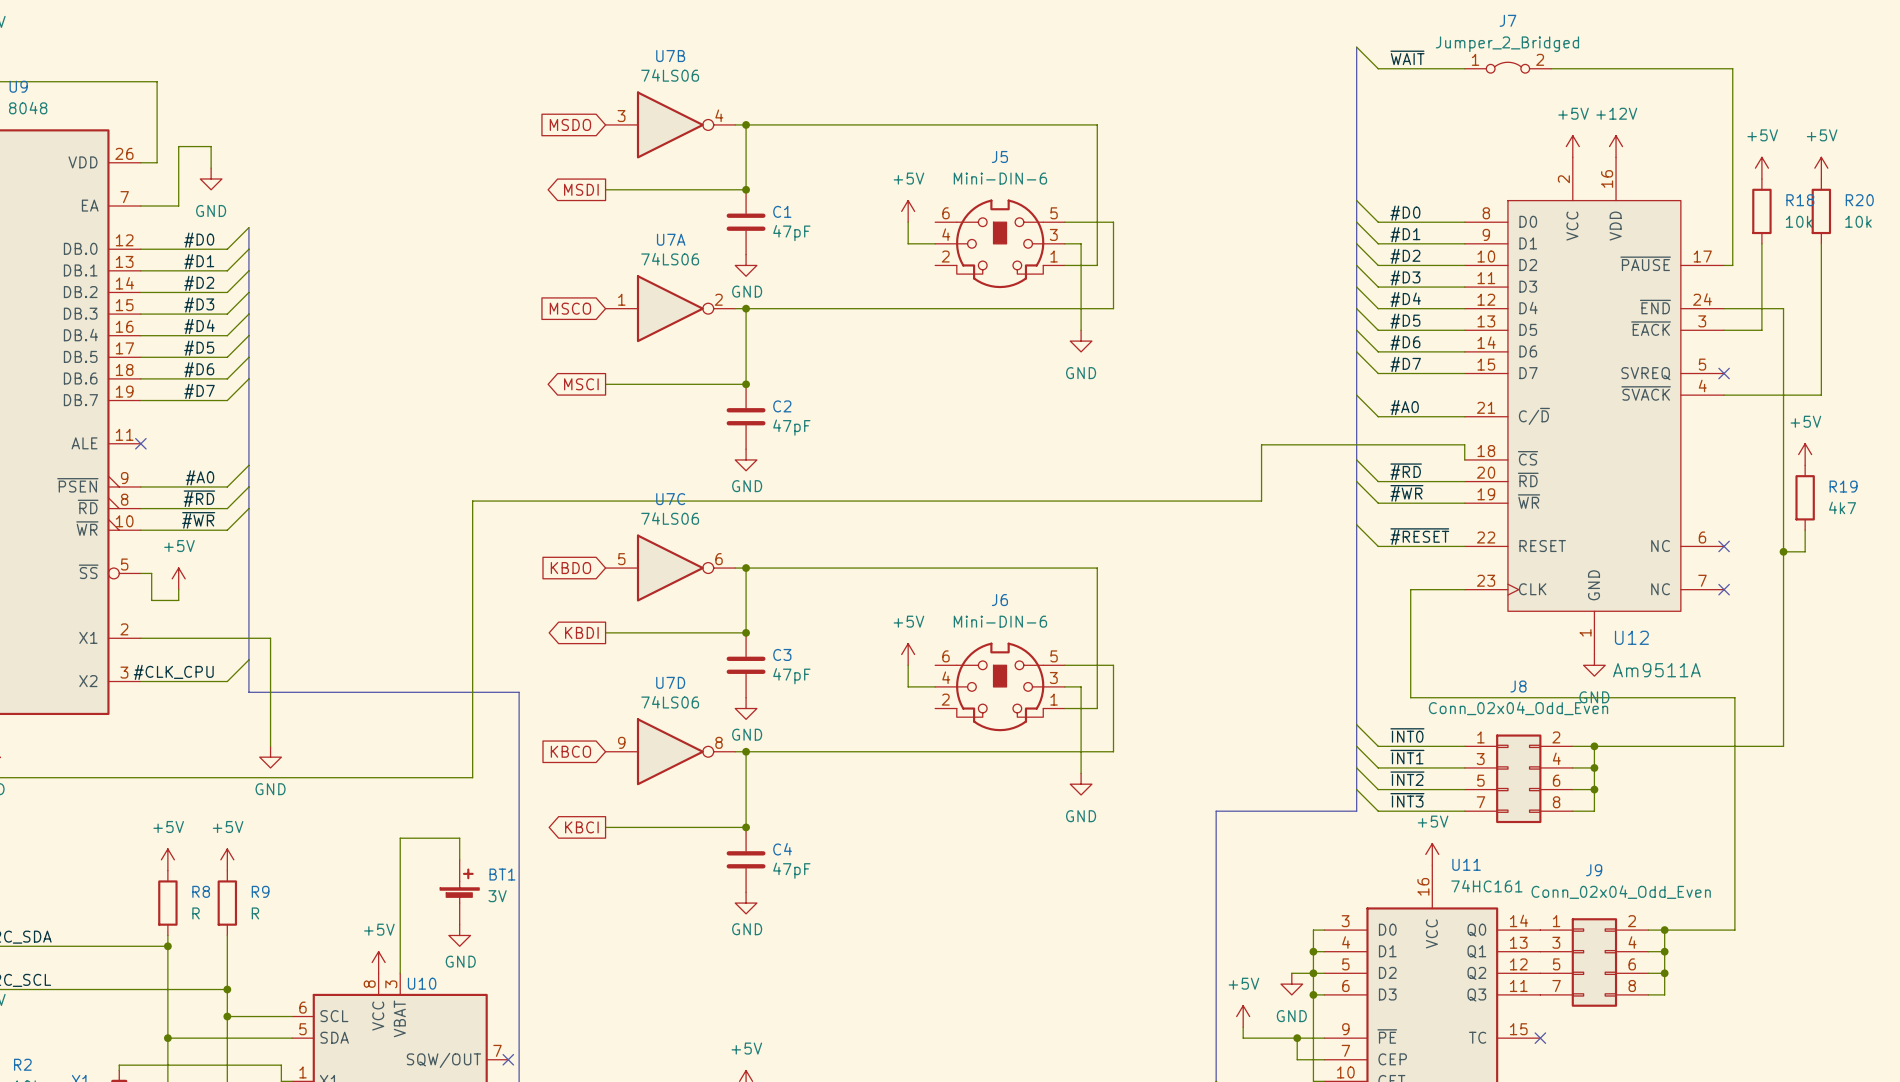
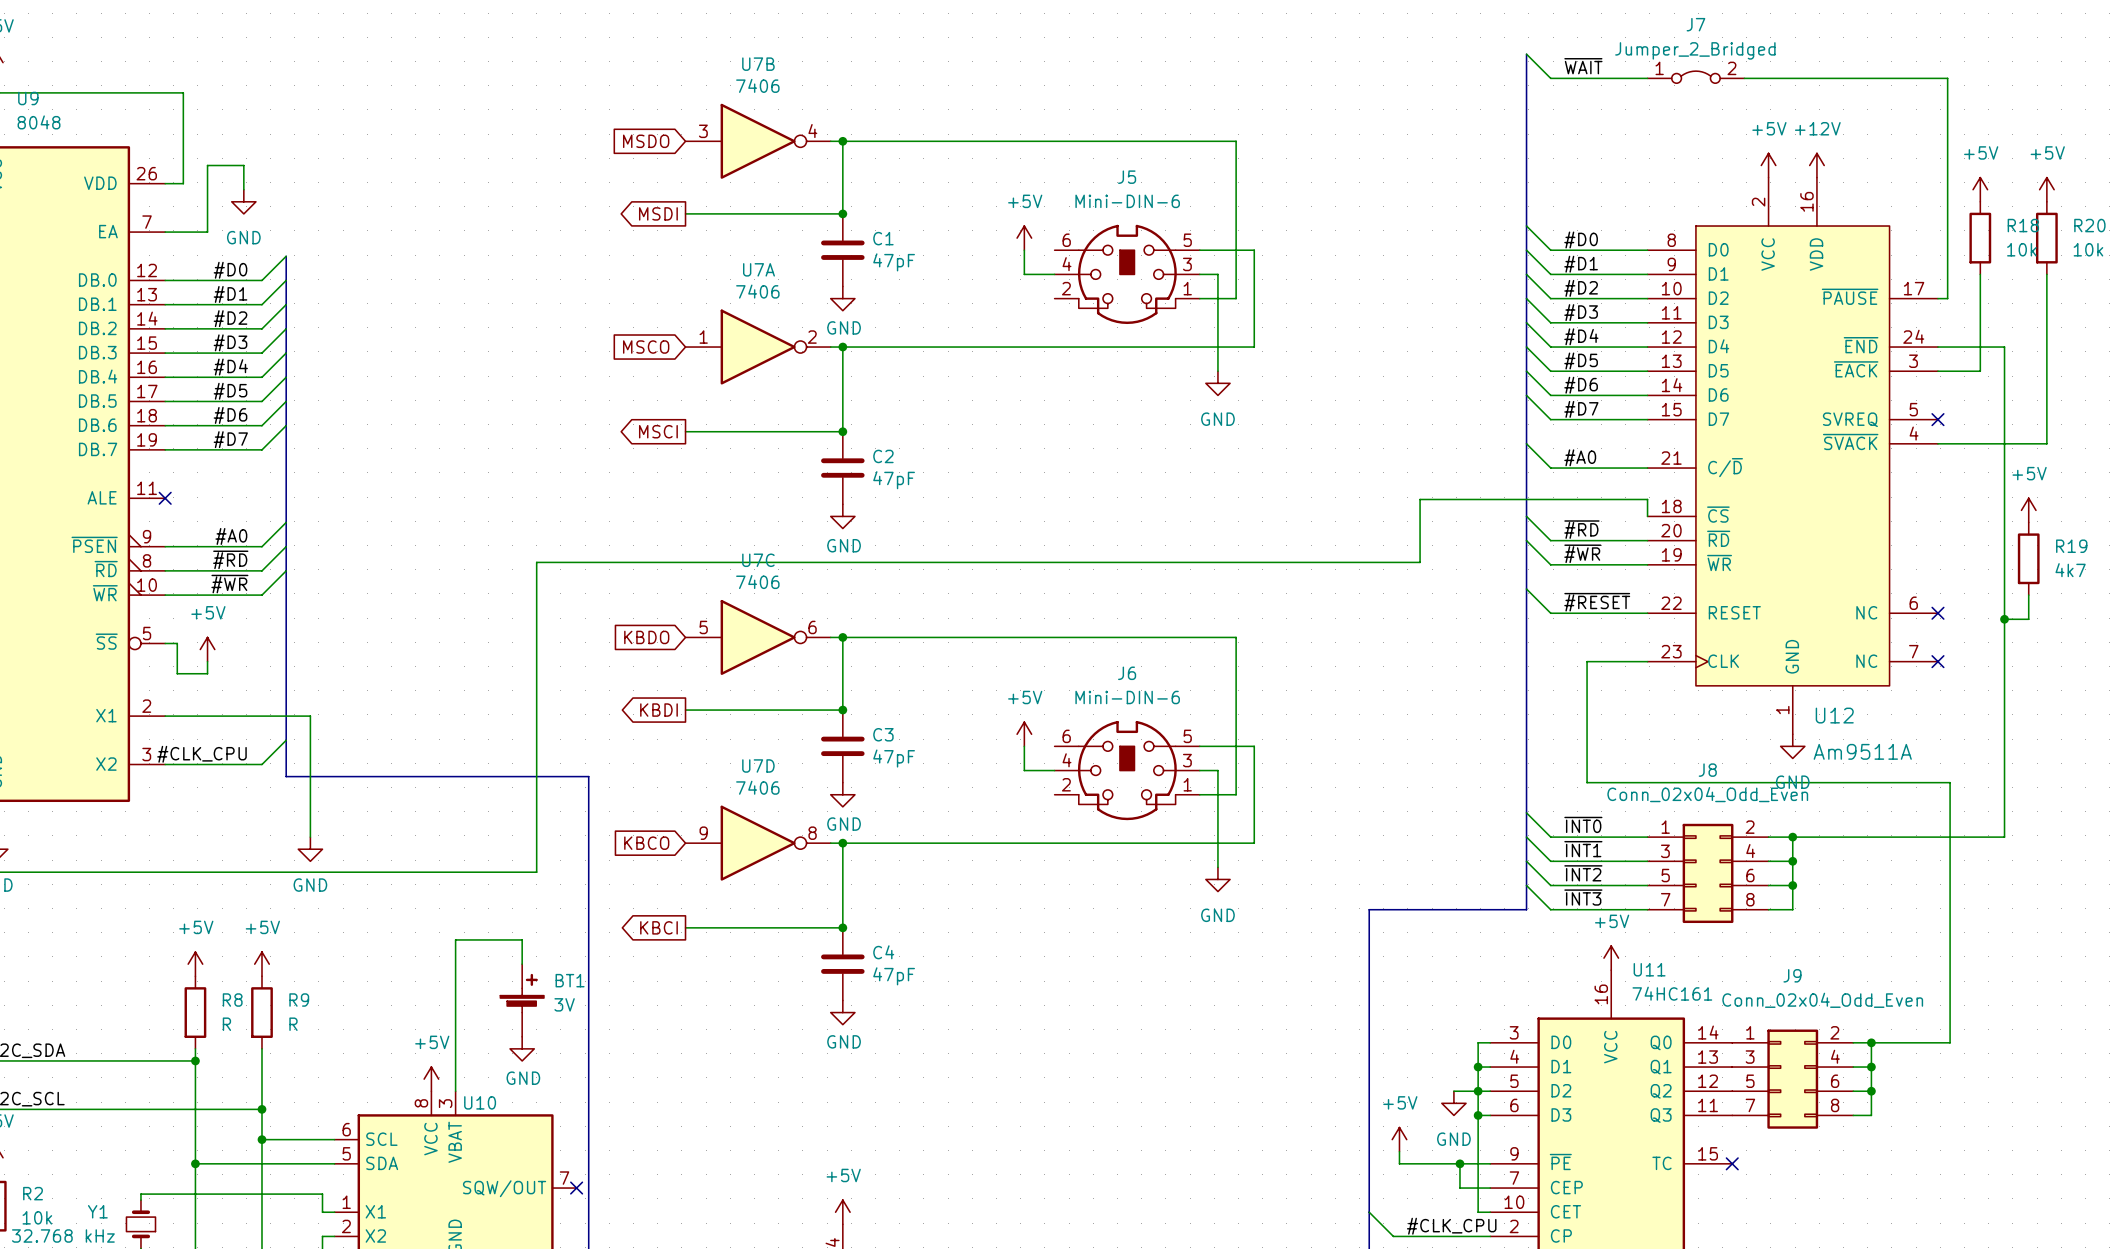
U7B value: 74LS06 (670, 75) -> 7406 (757, 85)
U7A value: 74LS06 (670, 259) -> 7406 (757, 291)
U7C value: 74LS06 (670, 518) -> 7406 (757, 582)
U7D value: 74LS06 (670, 702) -> 7406 (757, 787)

